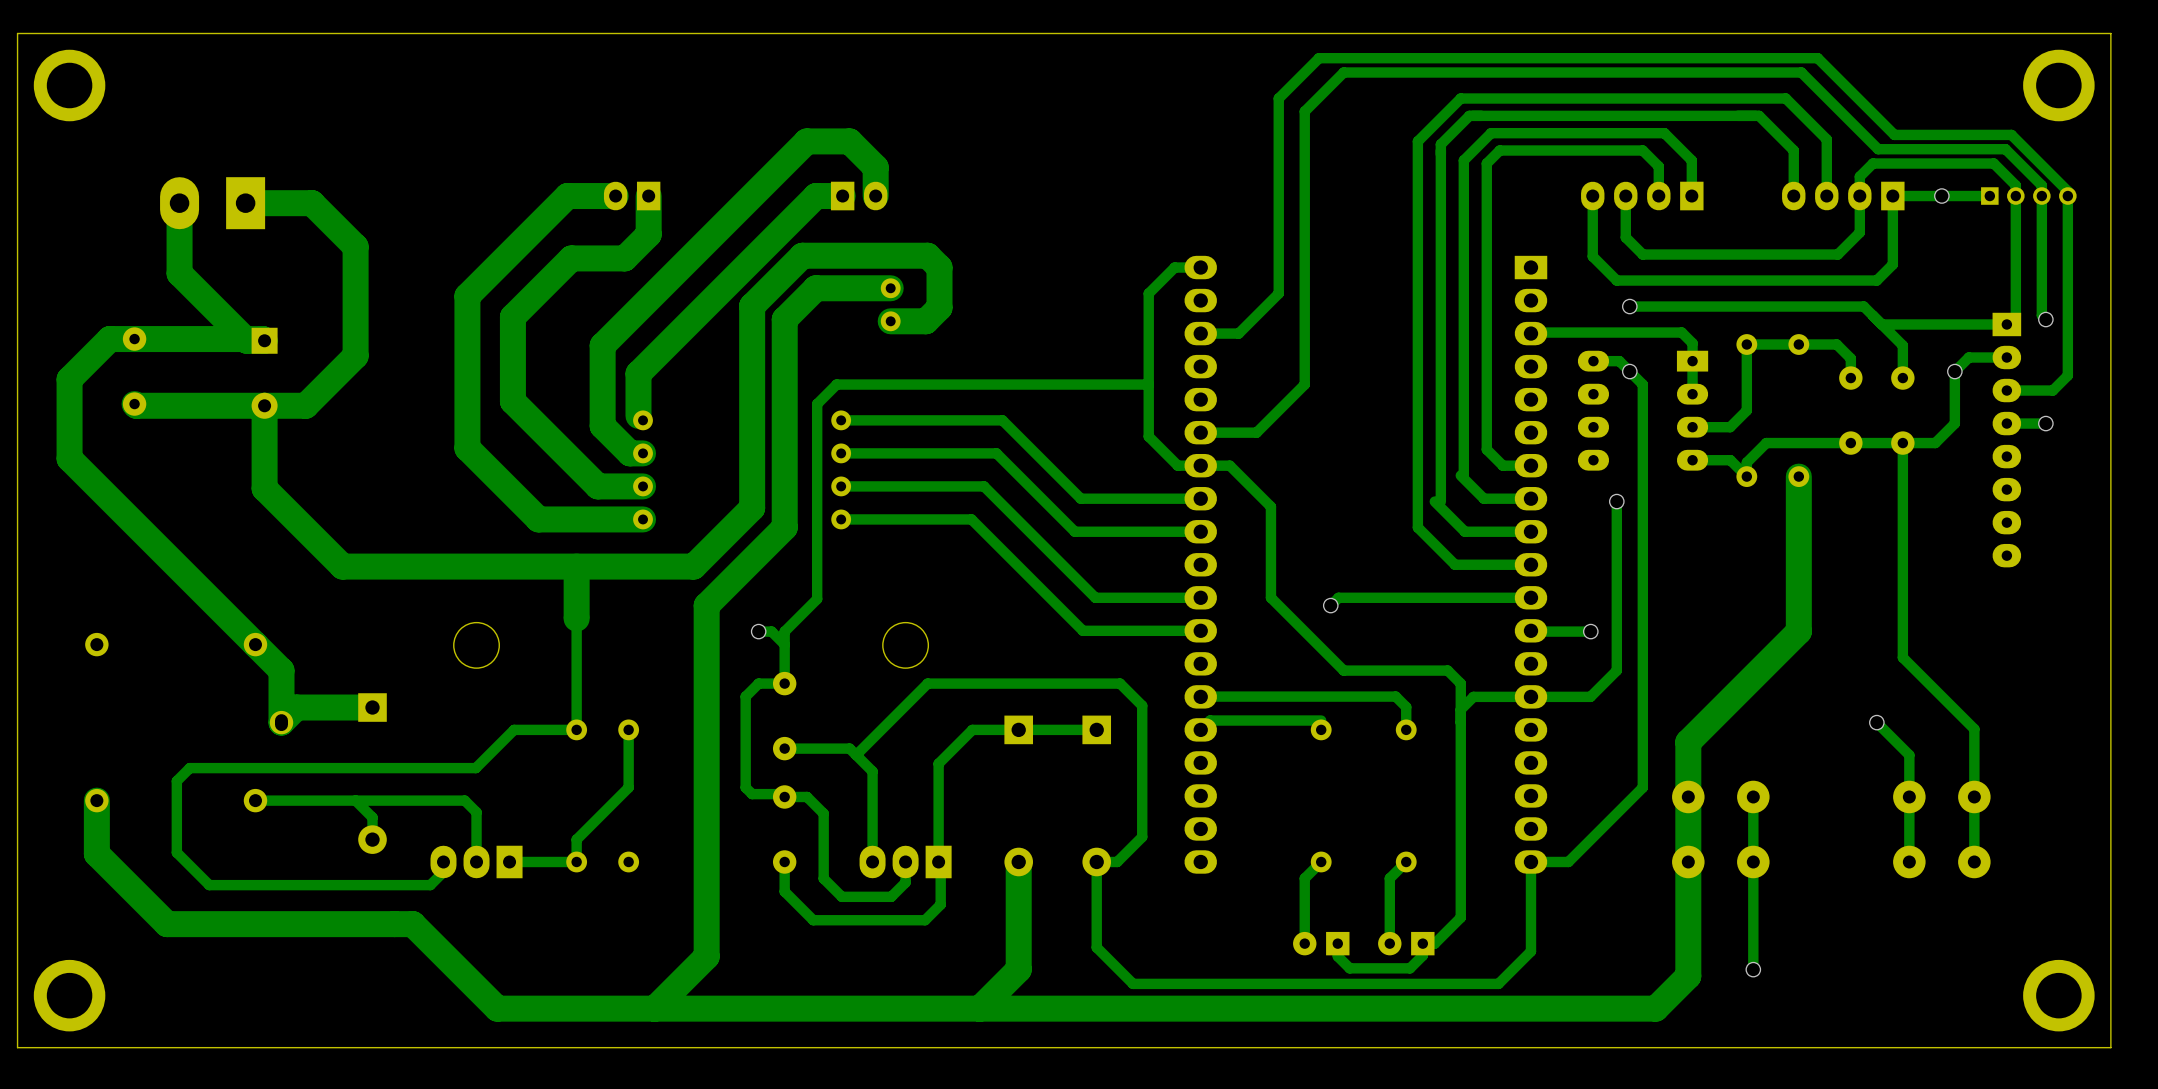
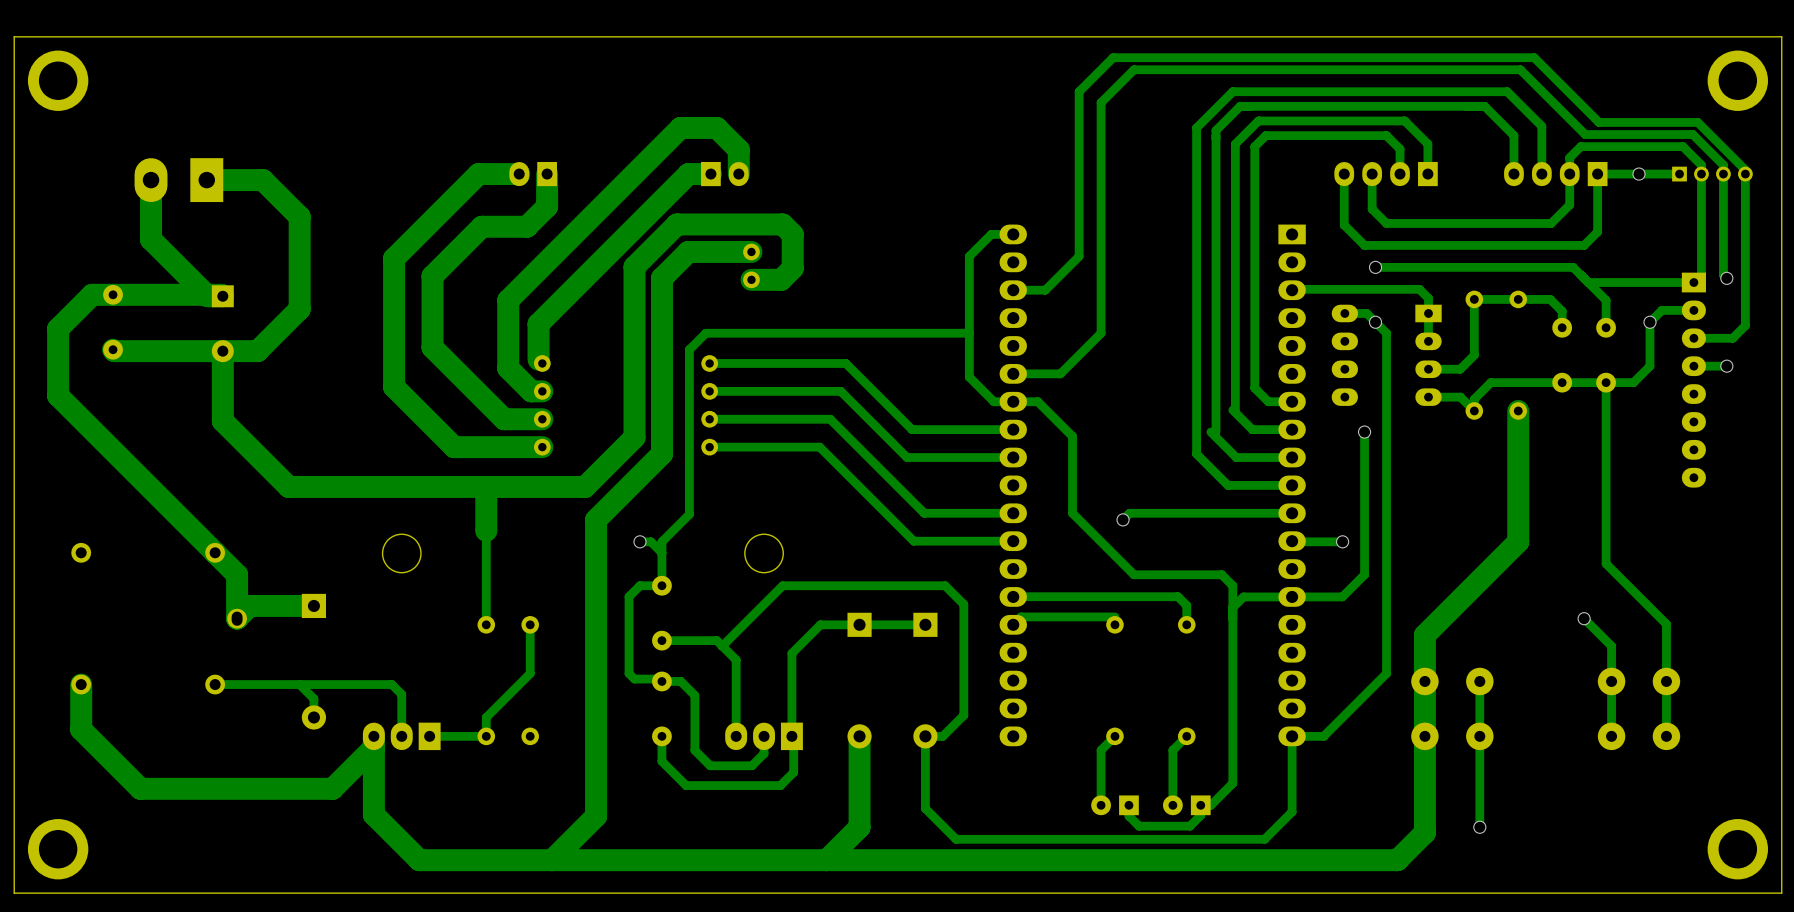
track: (576, 729) (514, 729) (475, 768) (189, 768) (176, 781) (176, 852) (209, 885) (430, 885) (443, 872) -> none
track: none -> (373, 747) (332, 788)
track: (394, 924) (412, 924) (443, 954) -> (373, 744) (373, 814)

